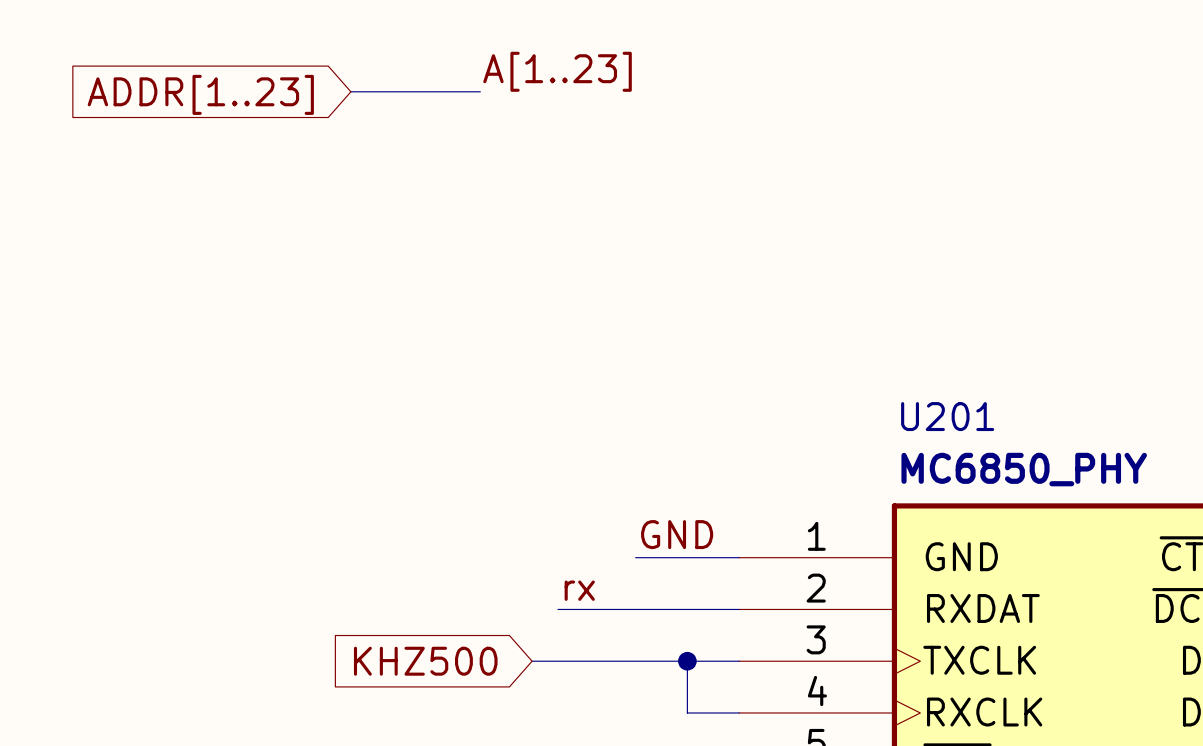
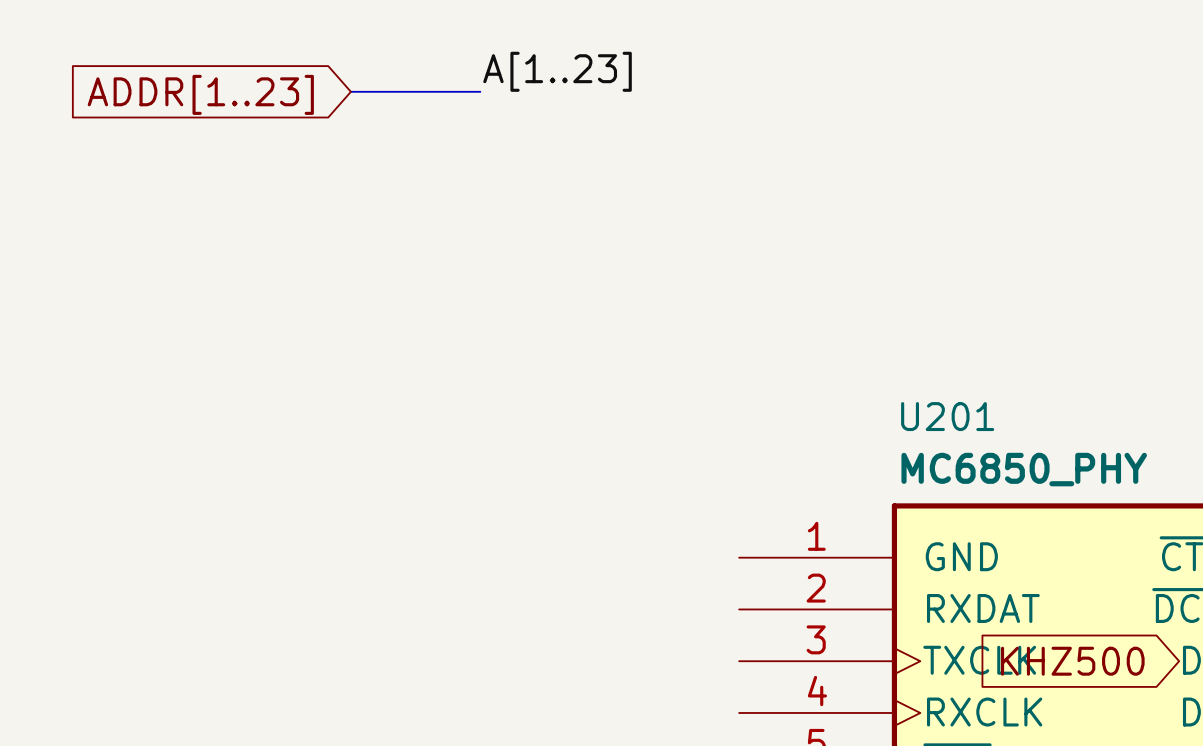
label: GND (677, 534) -> none
wire: (635, 557) (739, 557) -> none
label: rx (579, 590) -> none
wire: (557, 609) (739, 609) -> none
global label: KHZ500 (425, 661) -> none
wire: (532, 661) (739, 661) -> none
wire: (687, 661) (687, 712) (739, 712) -> none
junction: (687, 661) -> none
global label: none -> KHZ500 (1072, 661)

